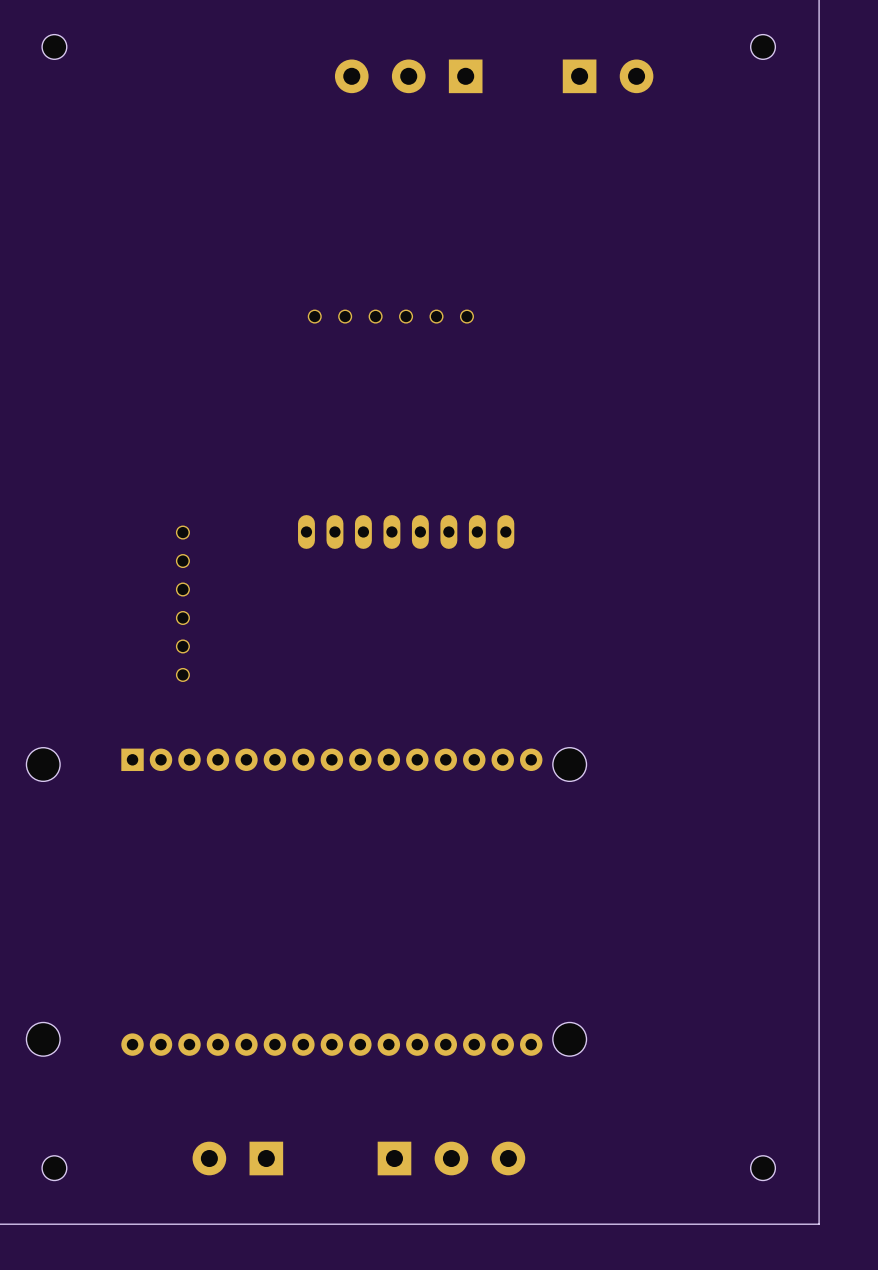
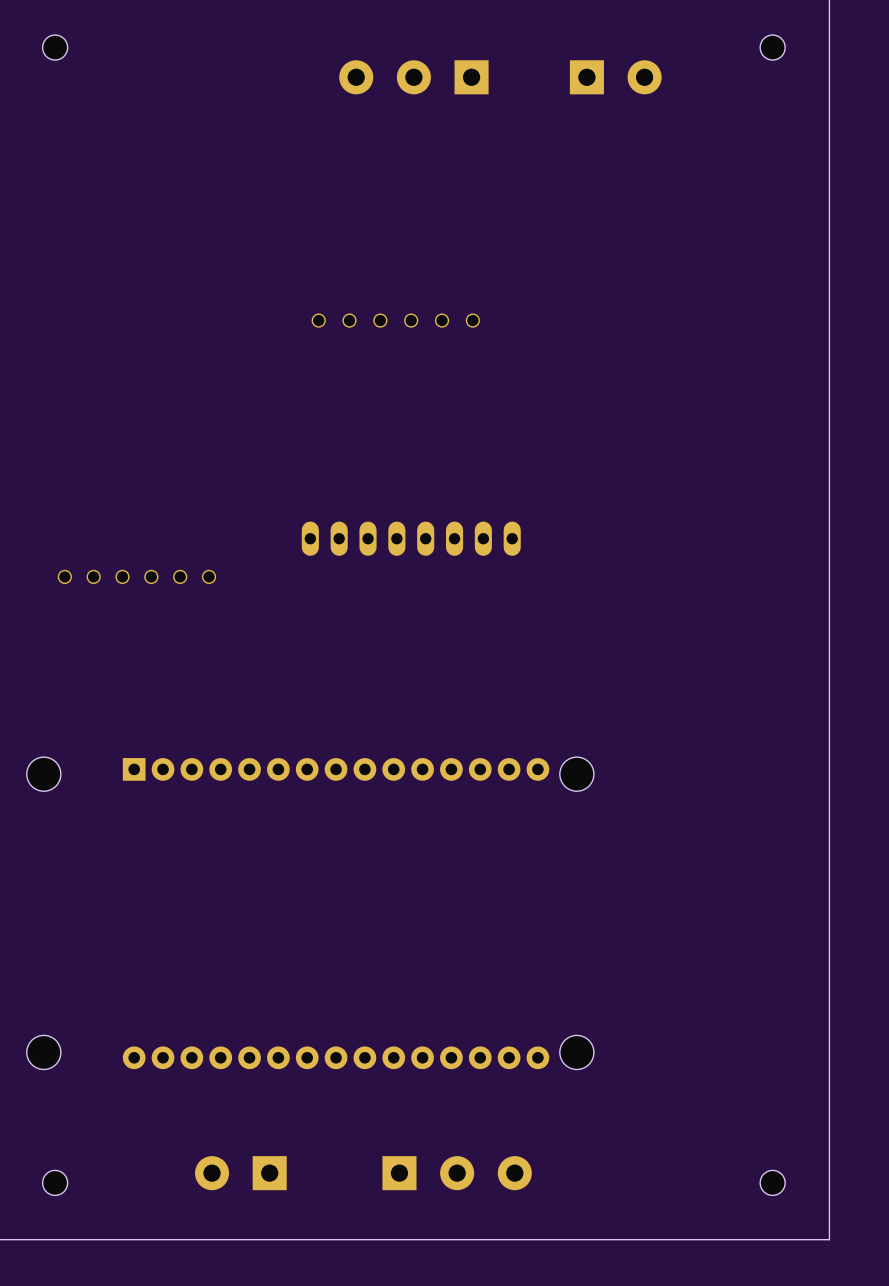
part rotation: 0° (182, 603) -> 90° clockwise (136, 576)

